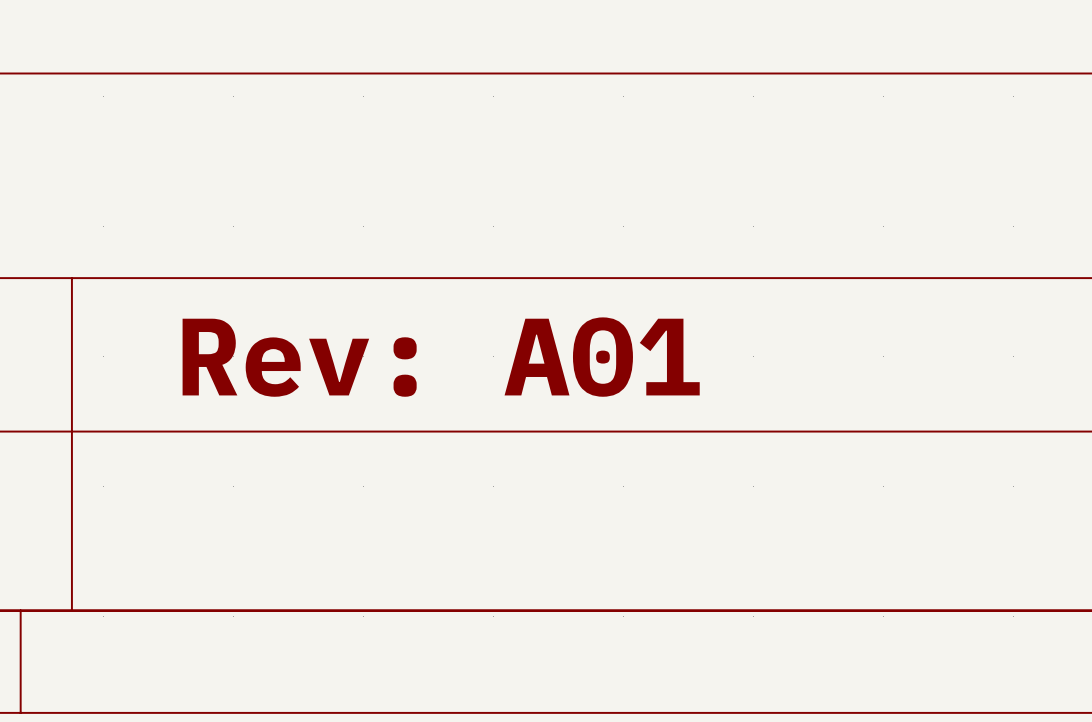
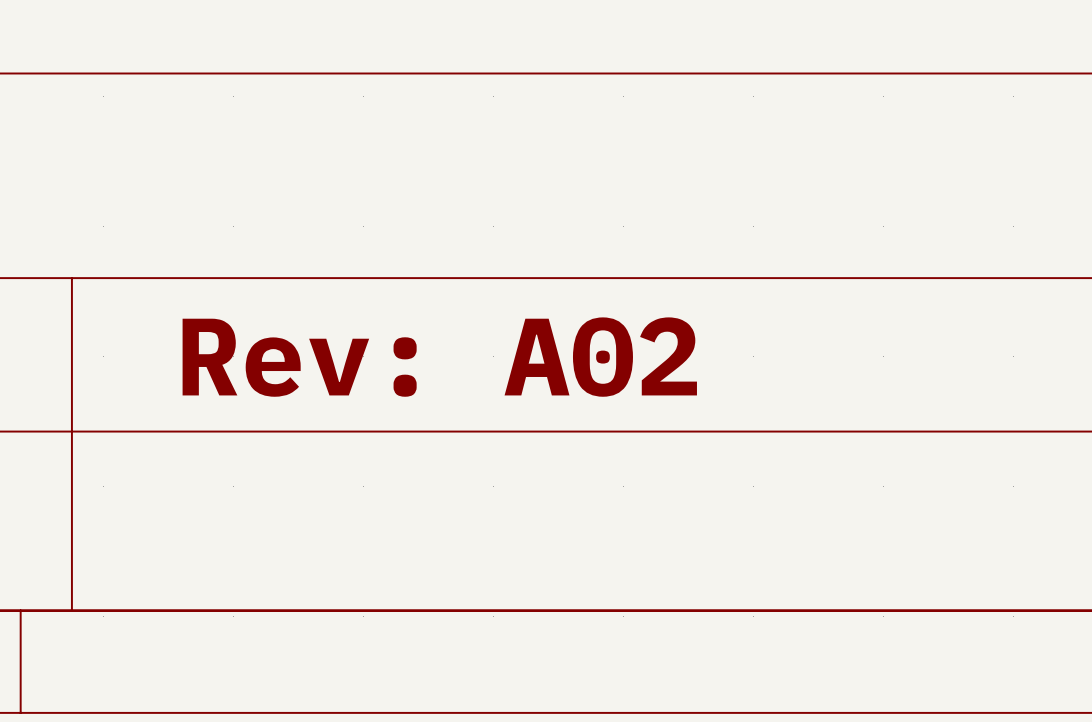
title block: Rev: A01 (441, 357) -> Rev: A02 (439, 357)

